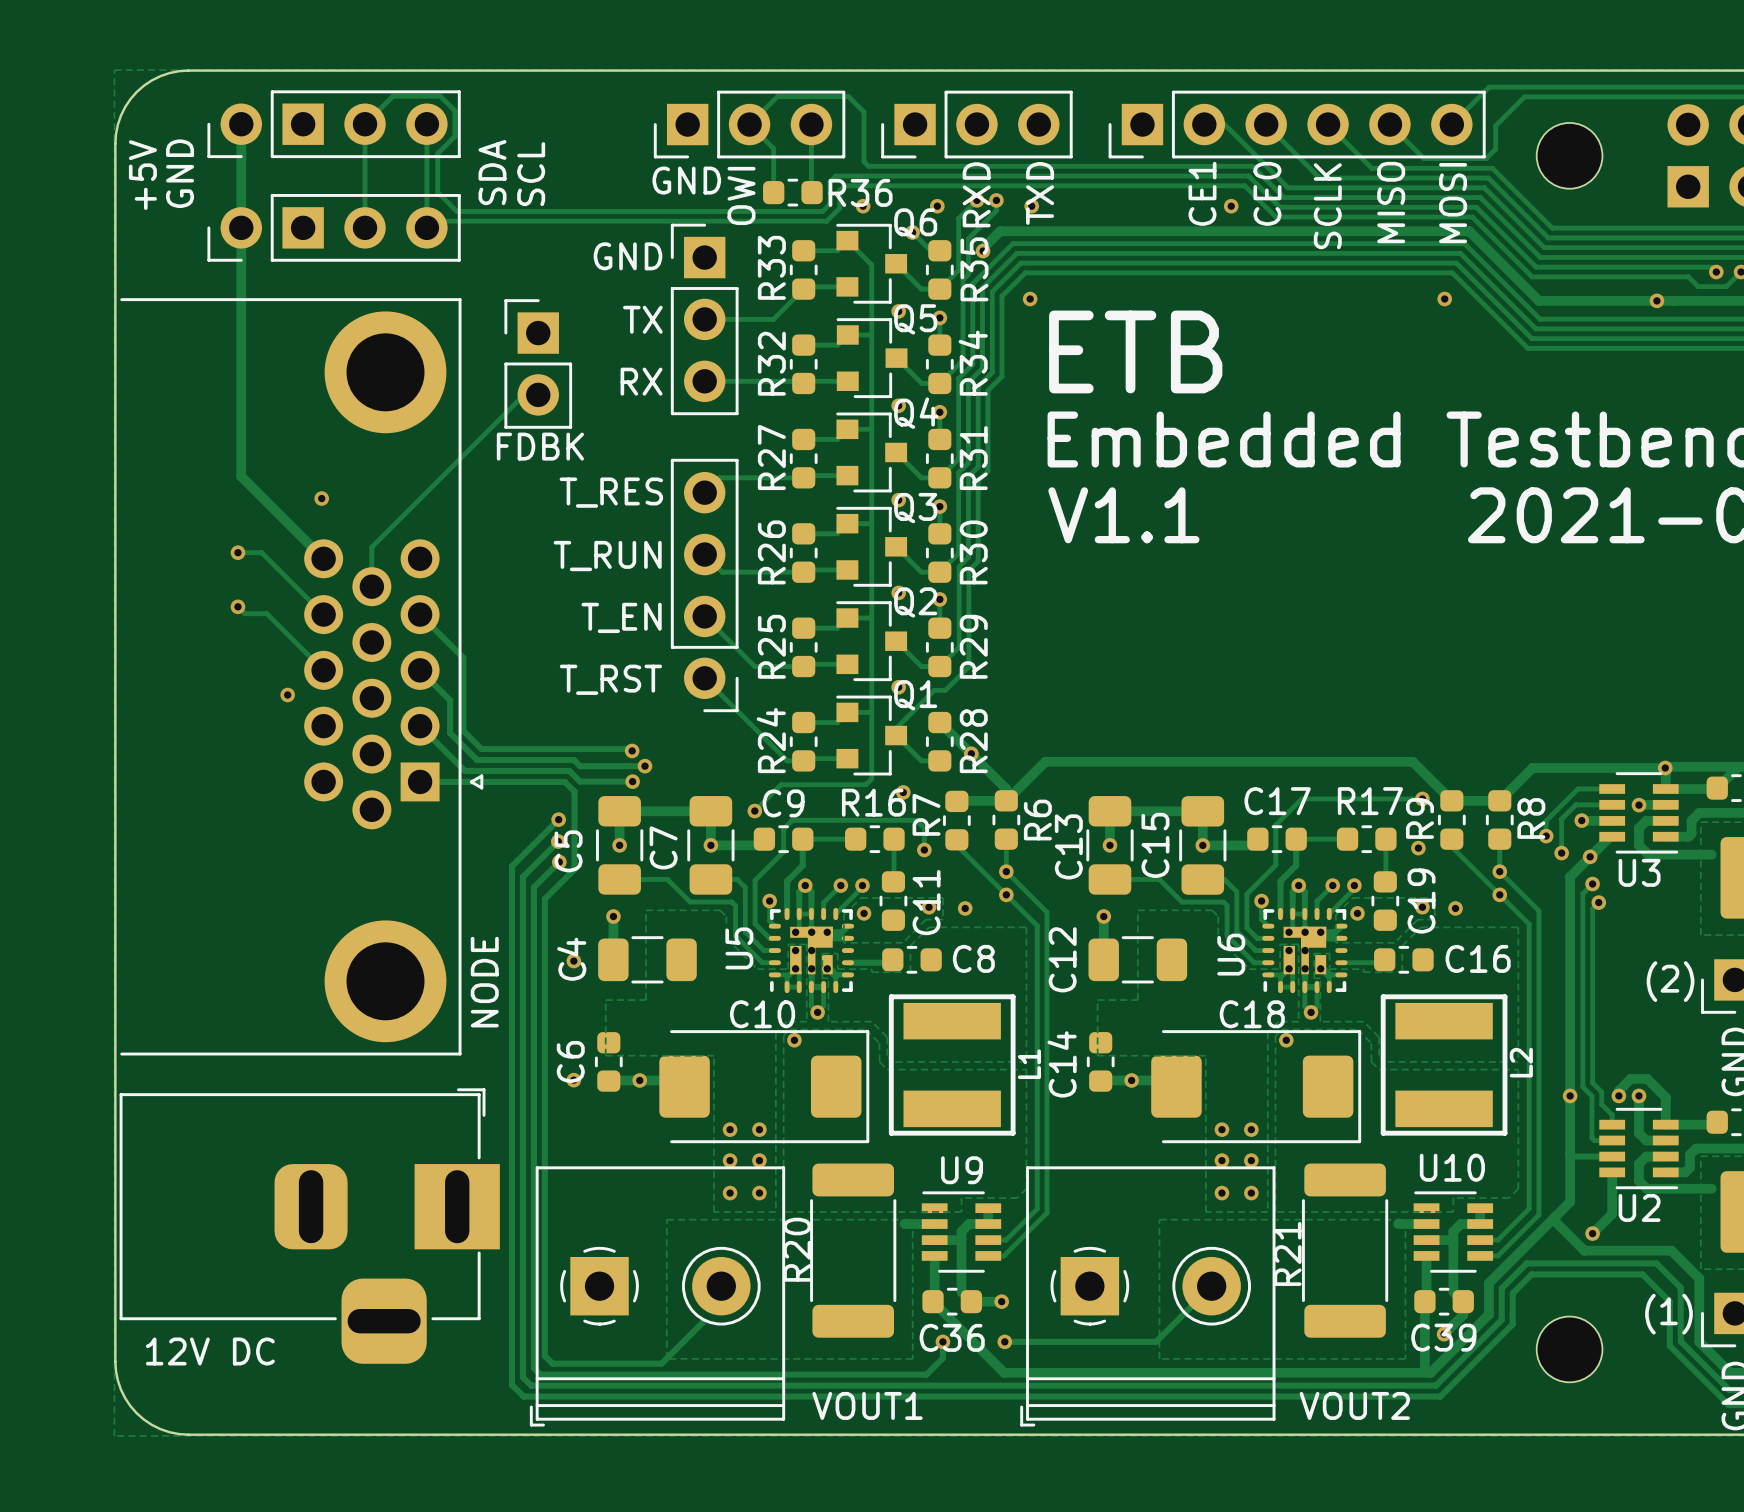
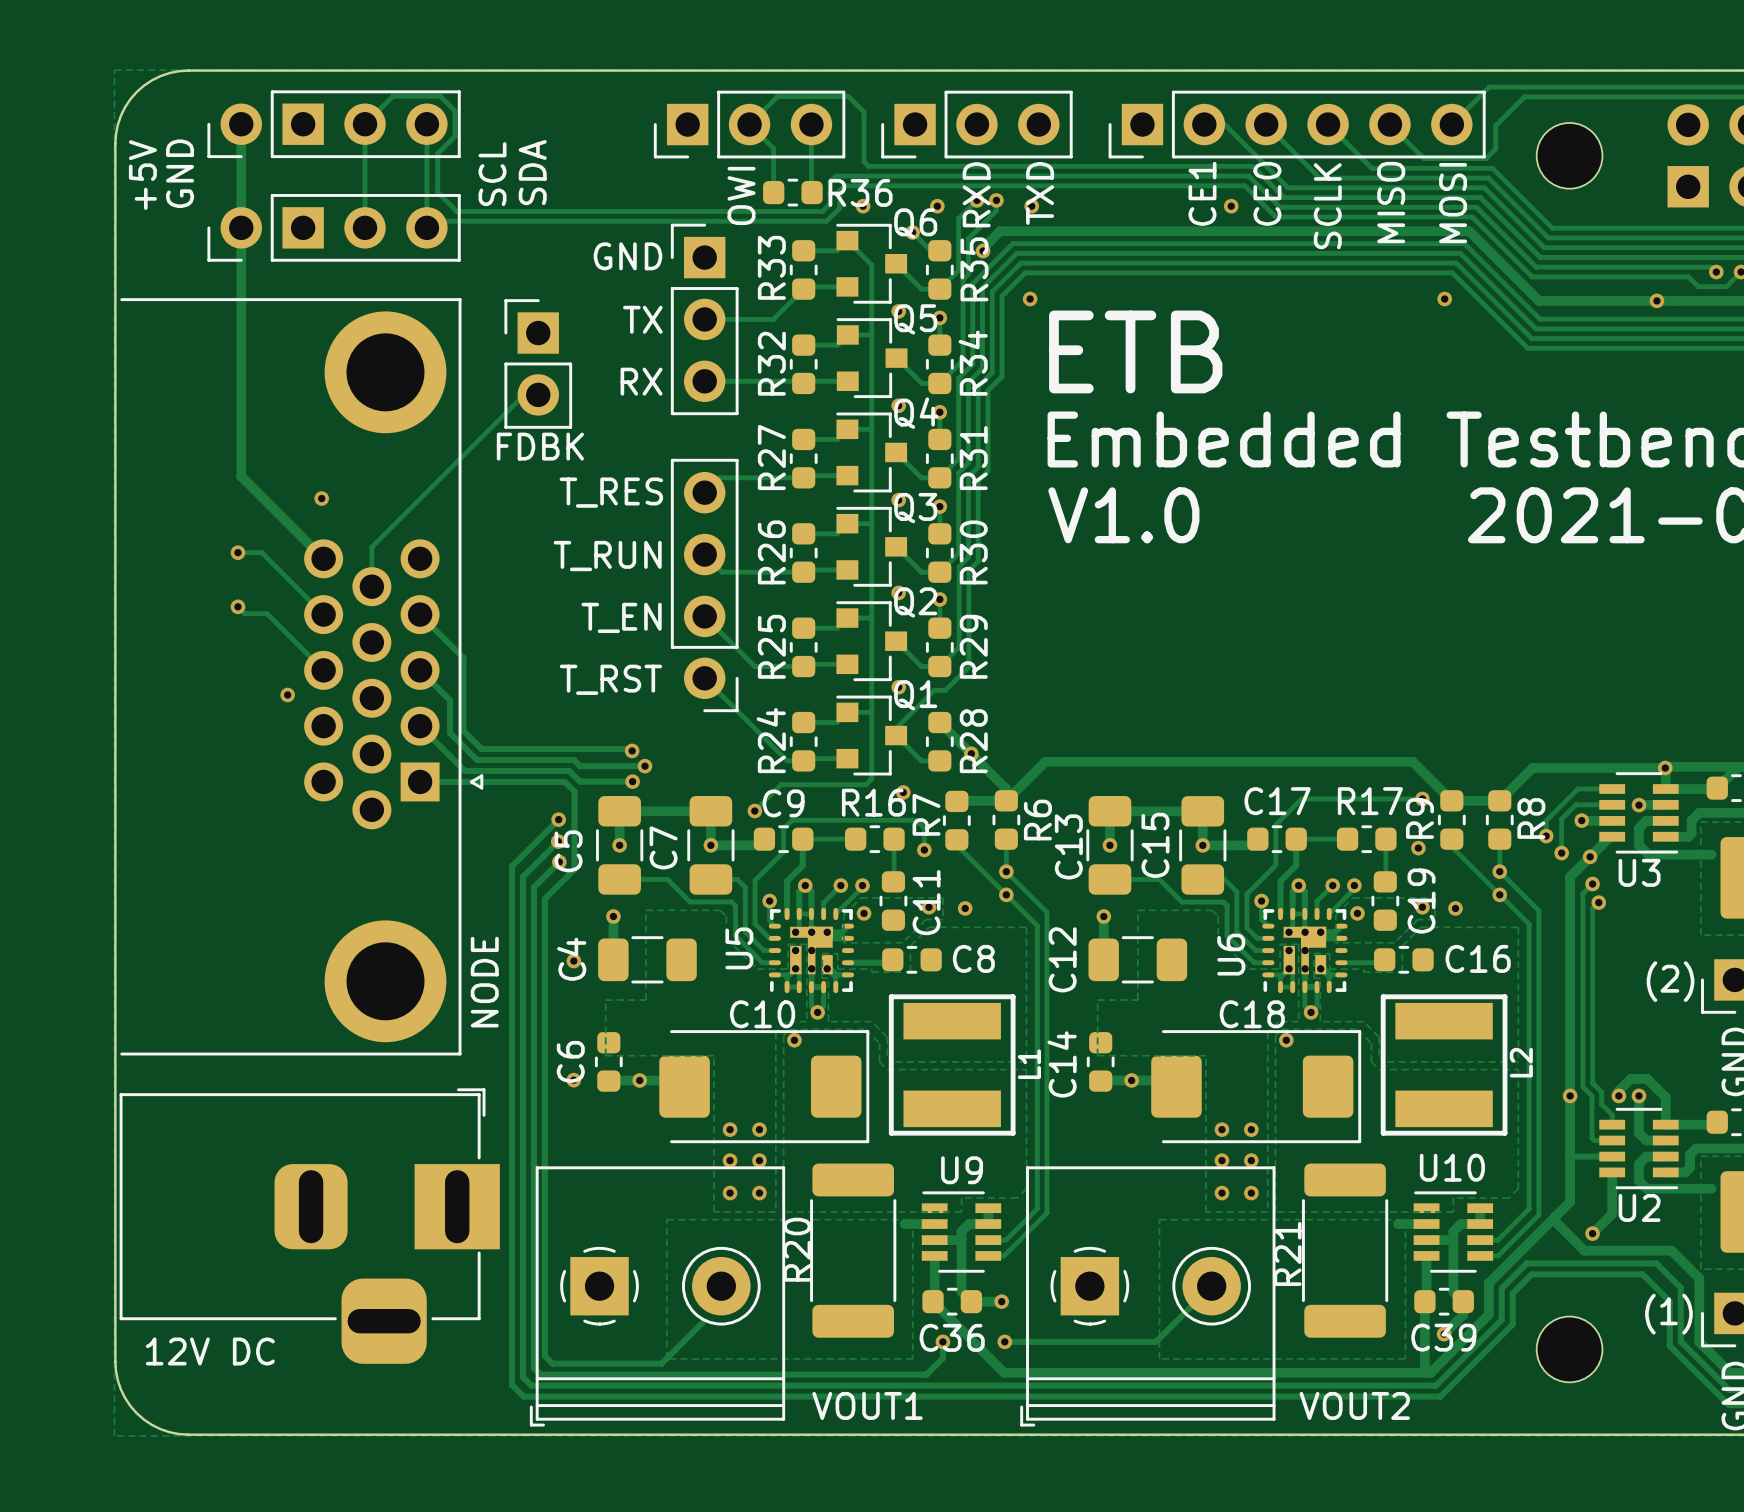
text: SDA (492, 172) -> SCL (492, 174)
text: SCL (531, 174) -> SDA (532, 172)
text: GND (686, 180) -> none
text: V1.1 (1123, 515) -> V1.0 (1123, 515)

